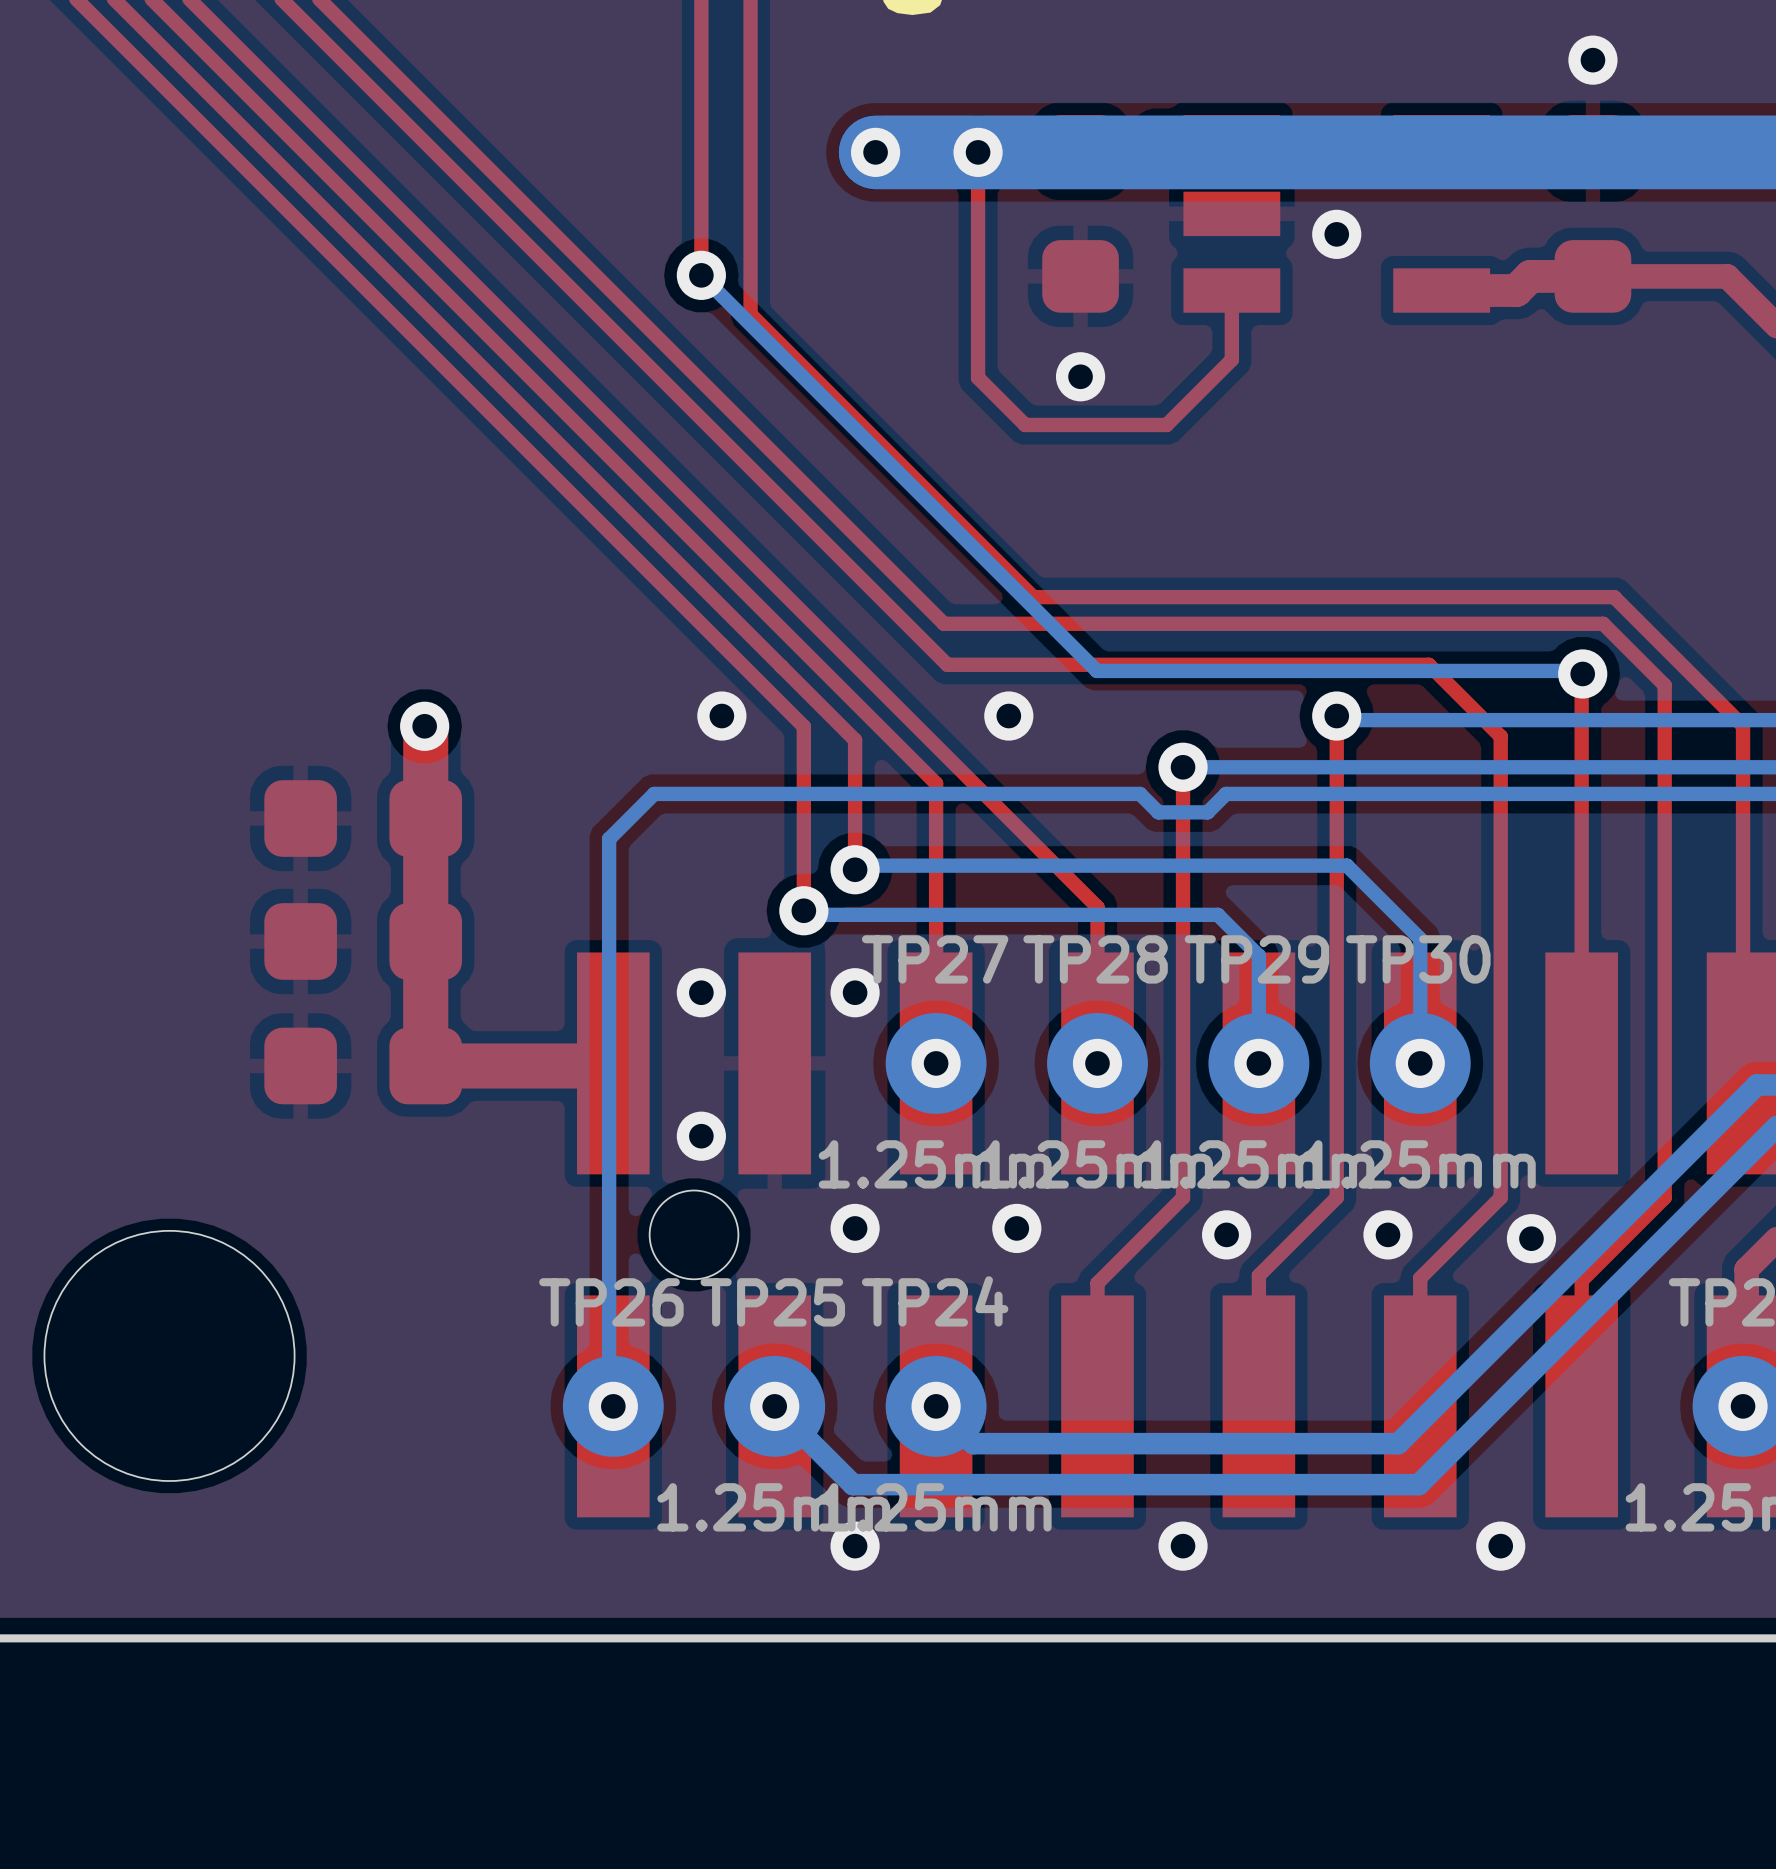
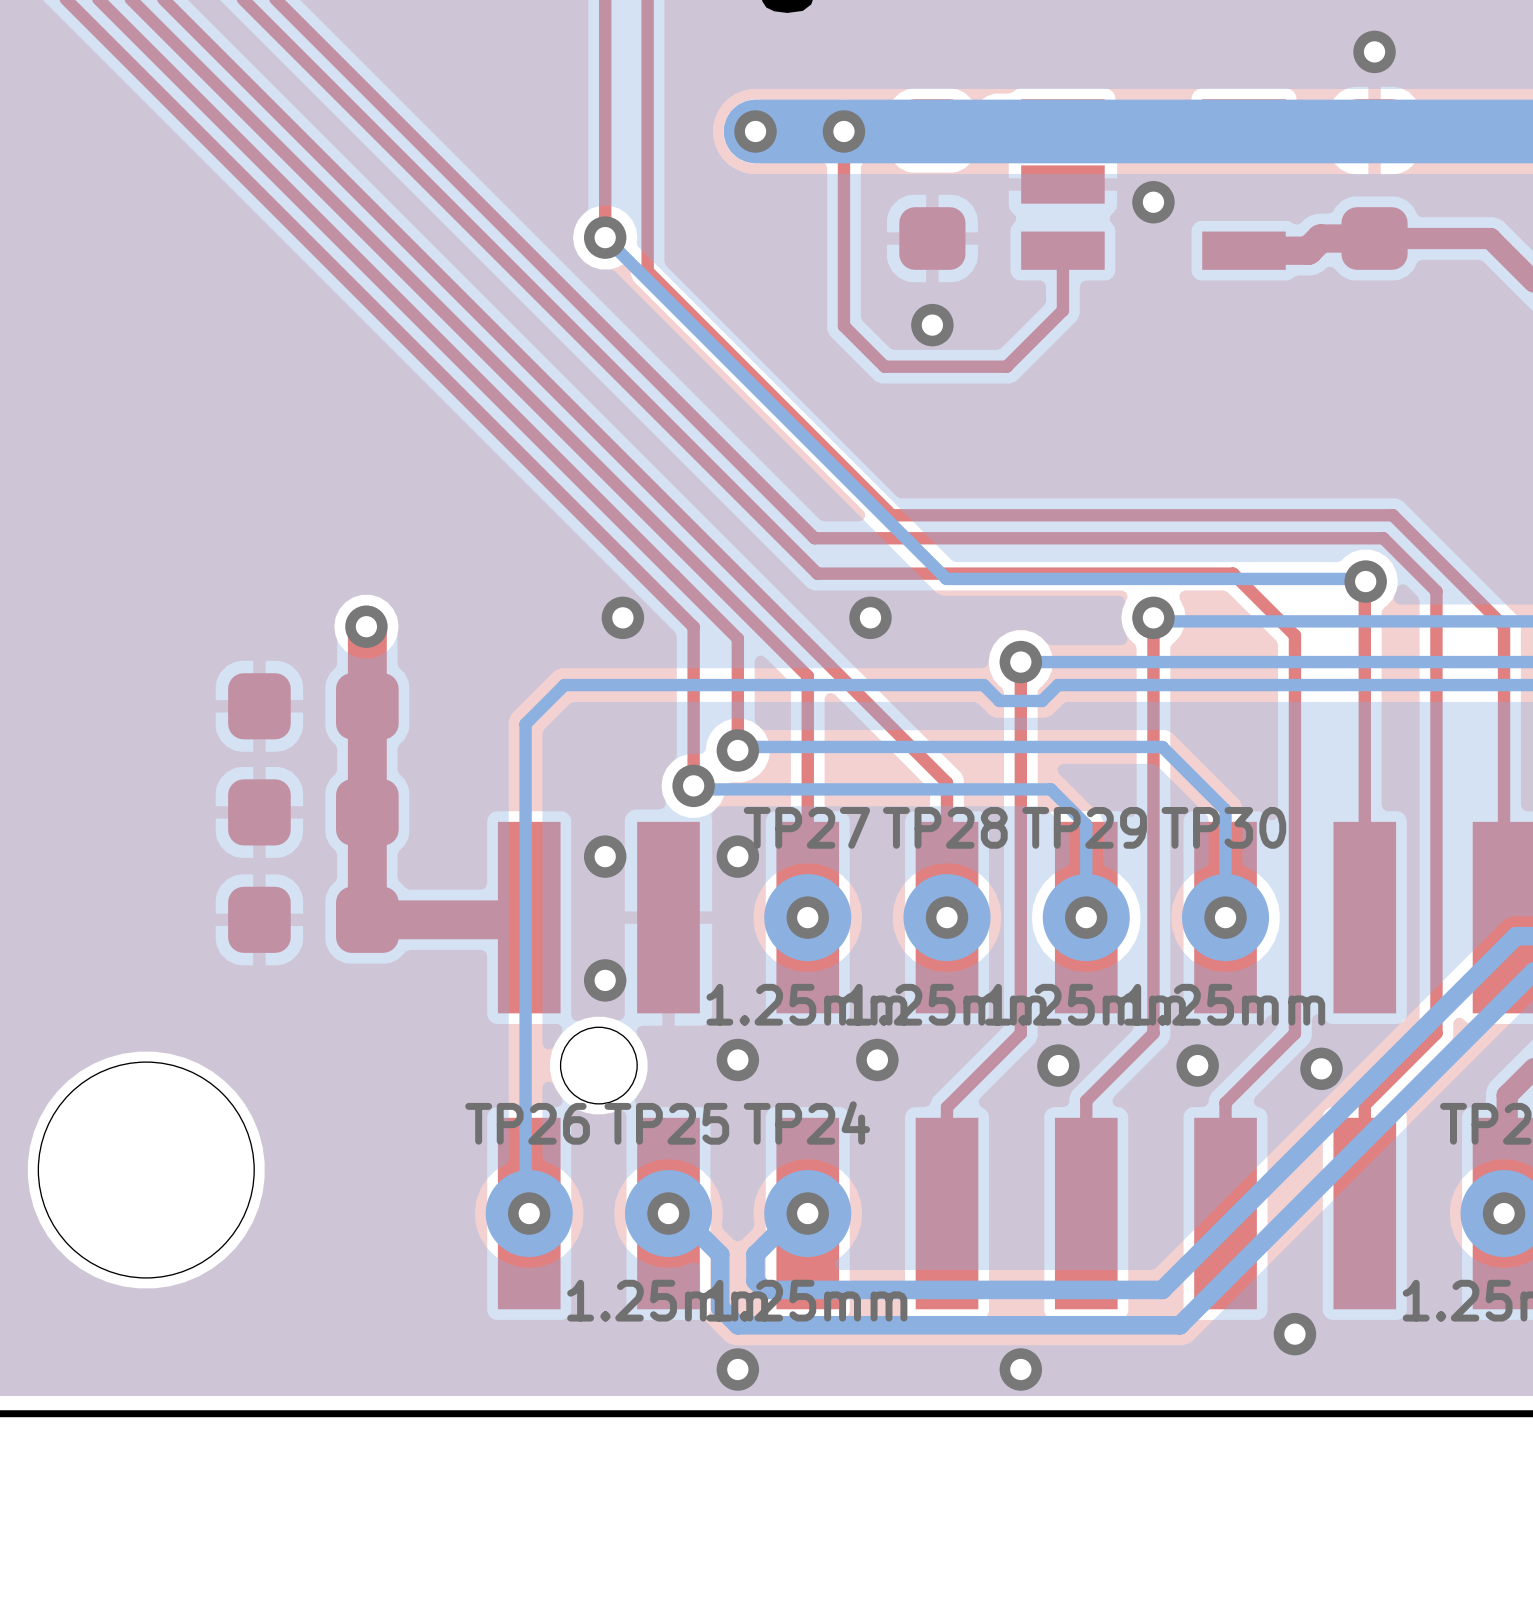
bottom track: (774, 1406) (852, 1484) (1418, 1484) -> (668, 1213) (679, 1213) (720, 1254) (720, 1307) (737, 1325) (1179, 1325) (1224, 1281)
bottom track: (936, 1406) (973, 1443) (1398, 1443) -> (807, 1213) (796, 1213) (755, 1254) (755, 1281) (764, 1289) (1162, 1289) (1206, 1245)
via position: (855, 1546) -> (737, 1369)
via position: (1183, 1546) -> (1020, 1369)

